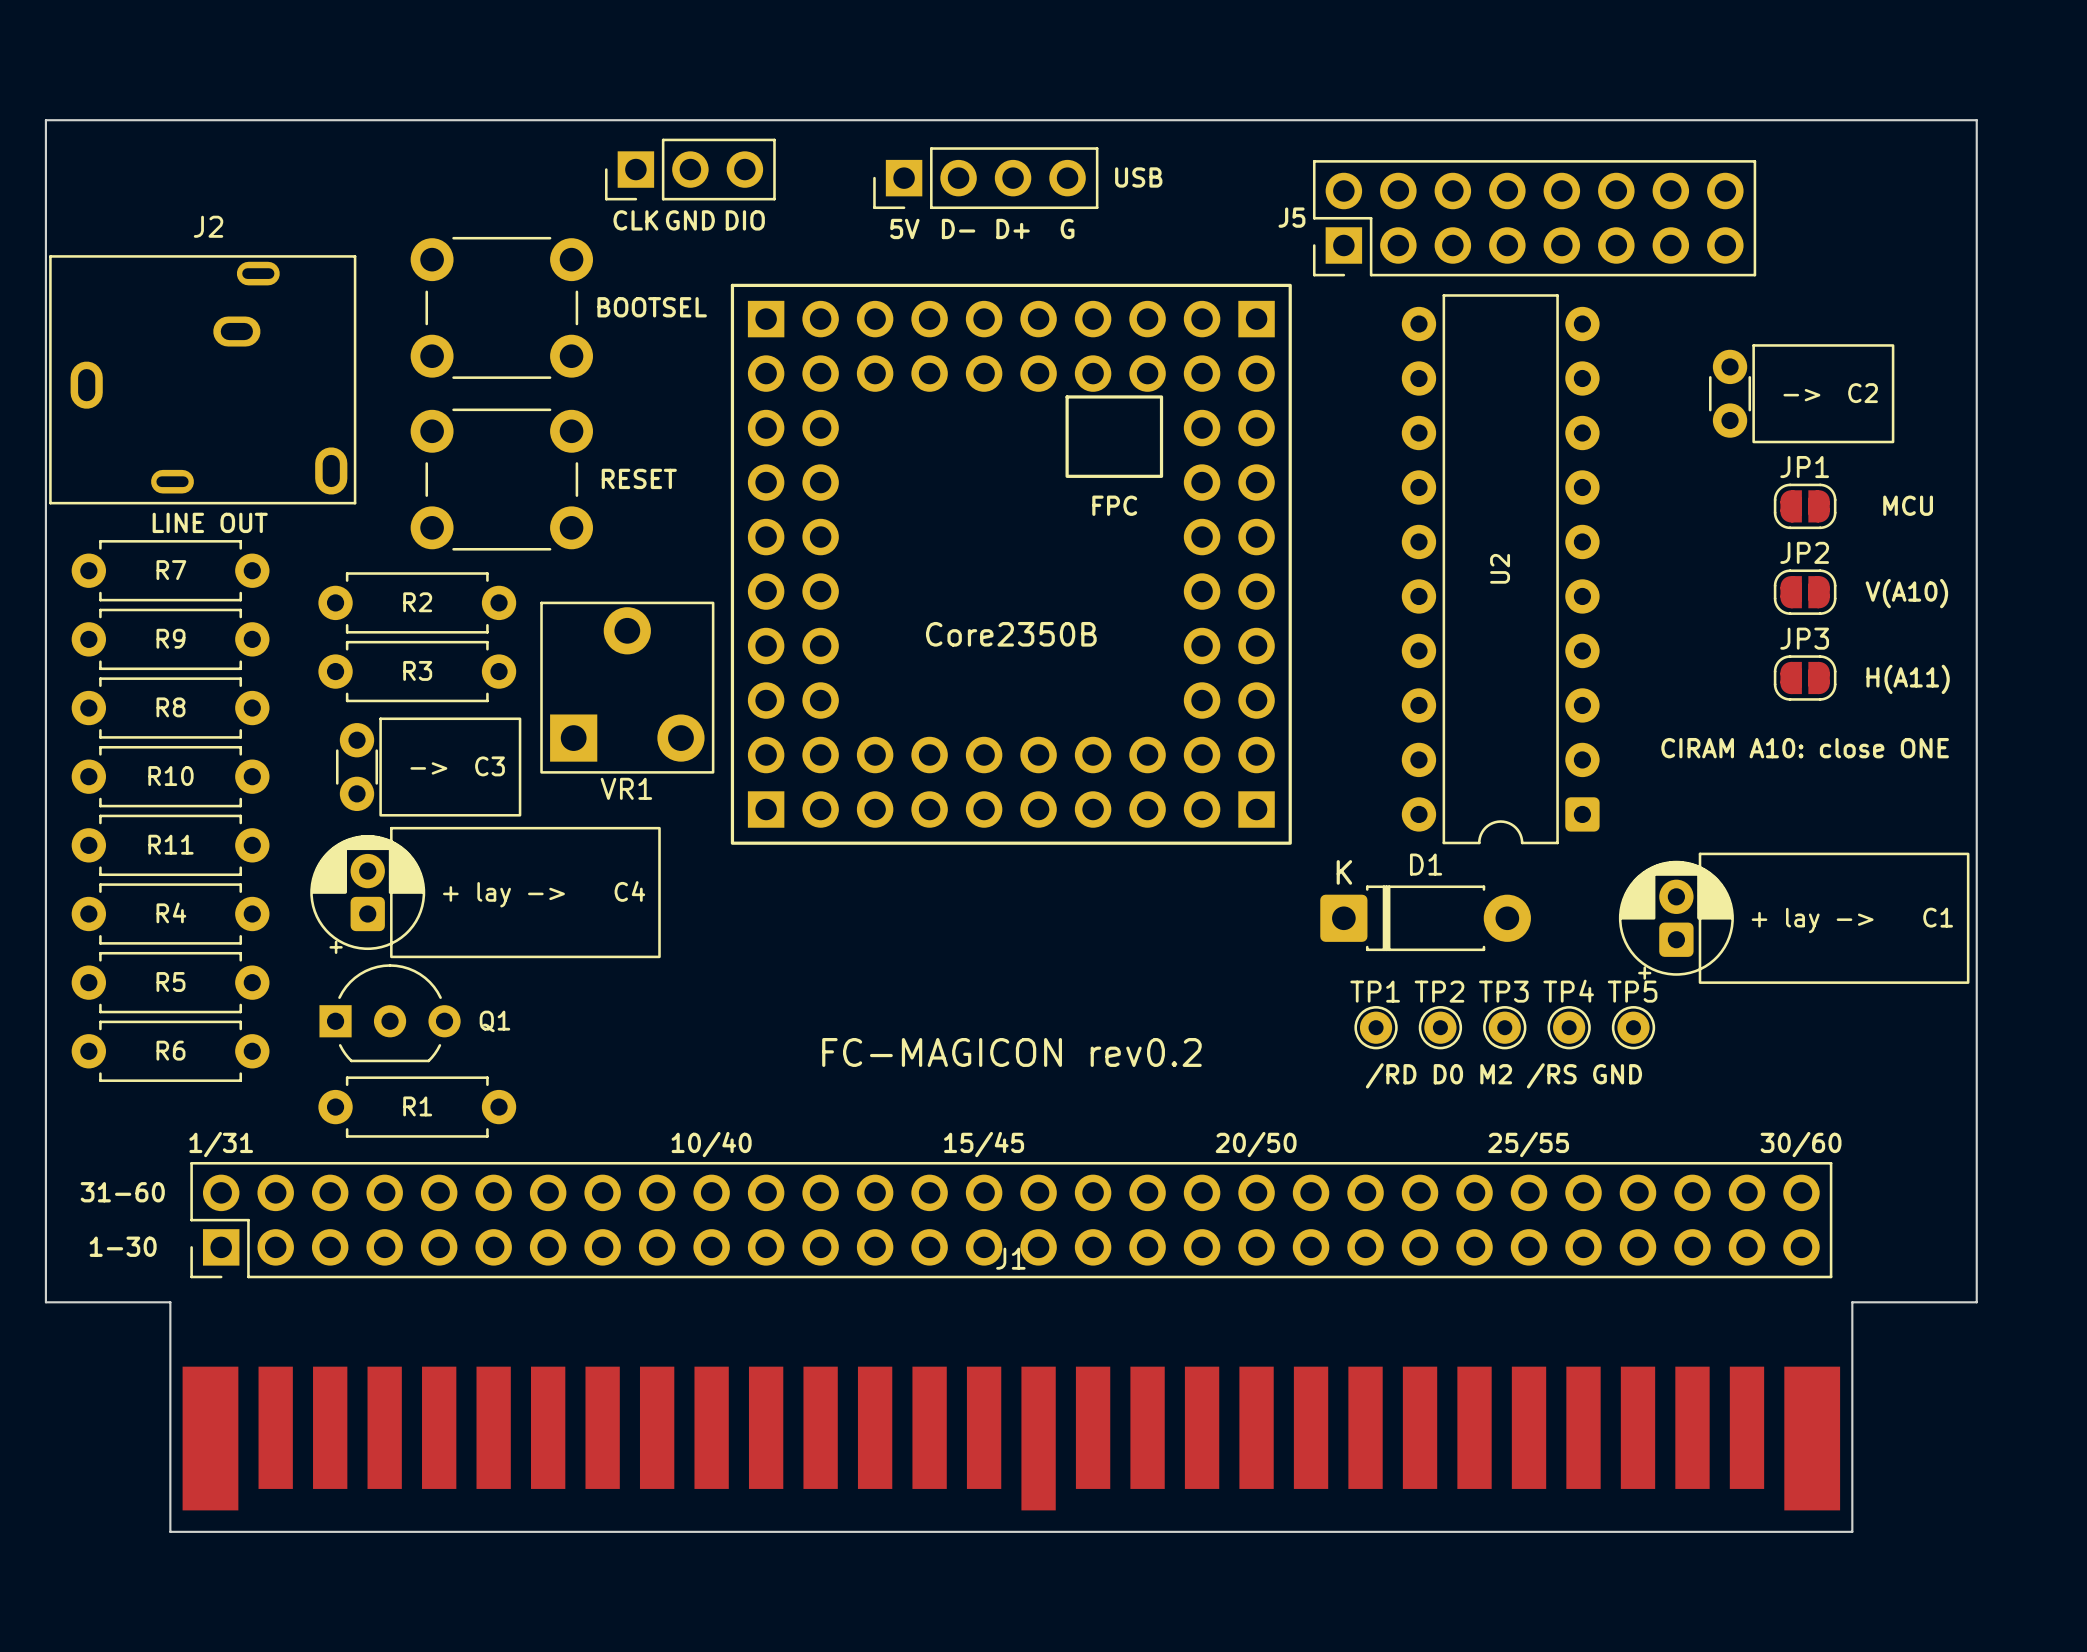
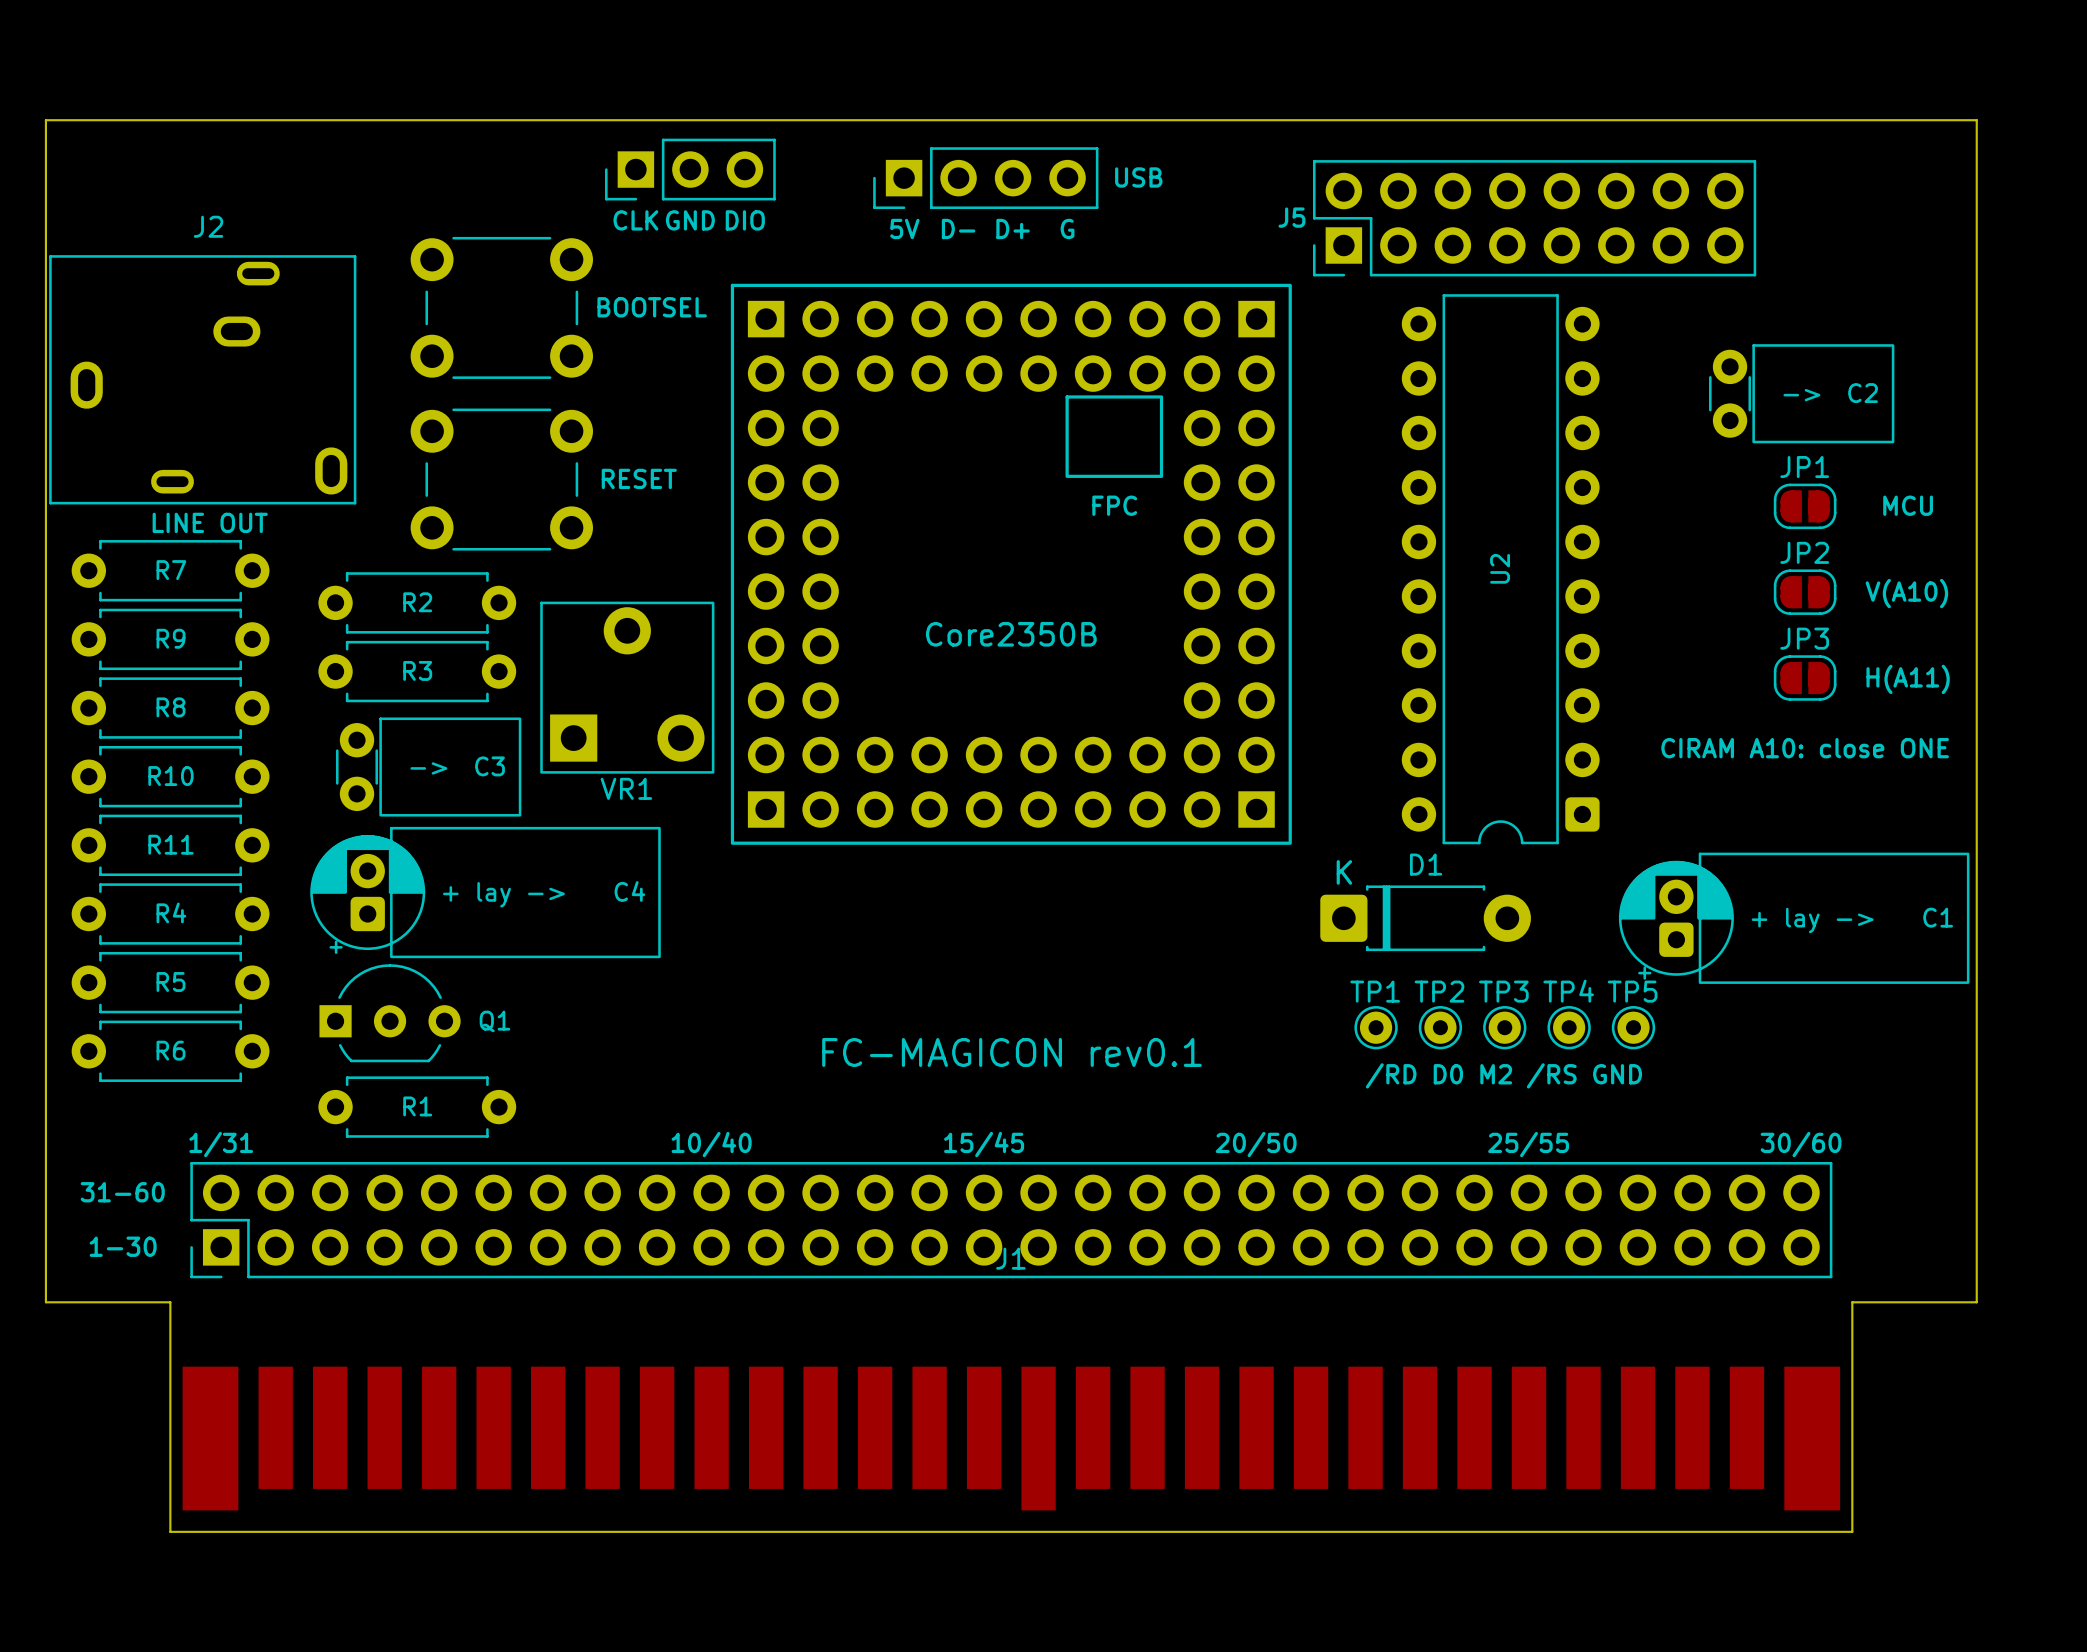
text: FC-MAGICON rev0.2 (1011, 1052) -> FC-MAGICON rev0.1 (1011, 1052)

